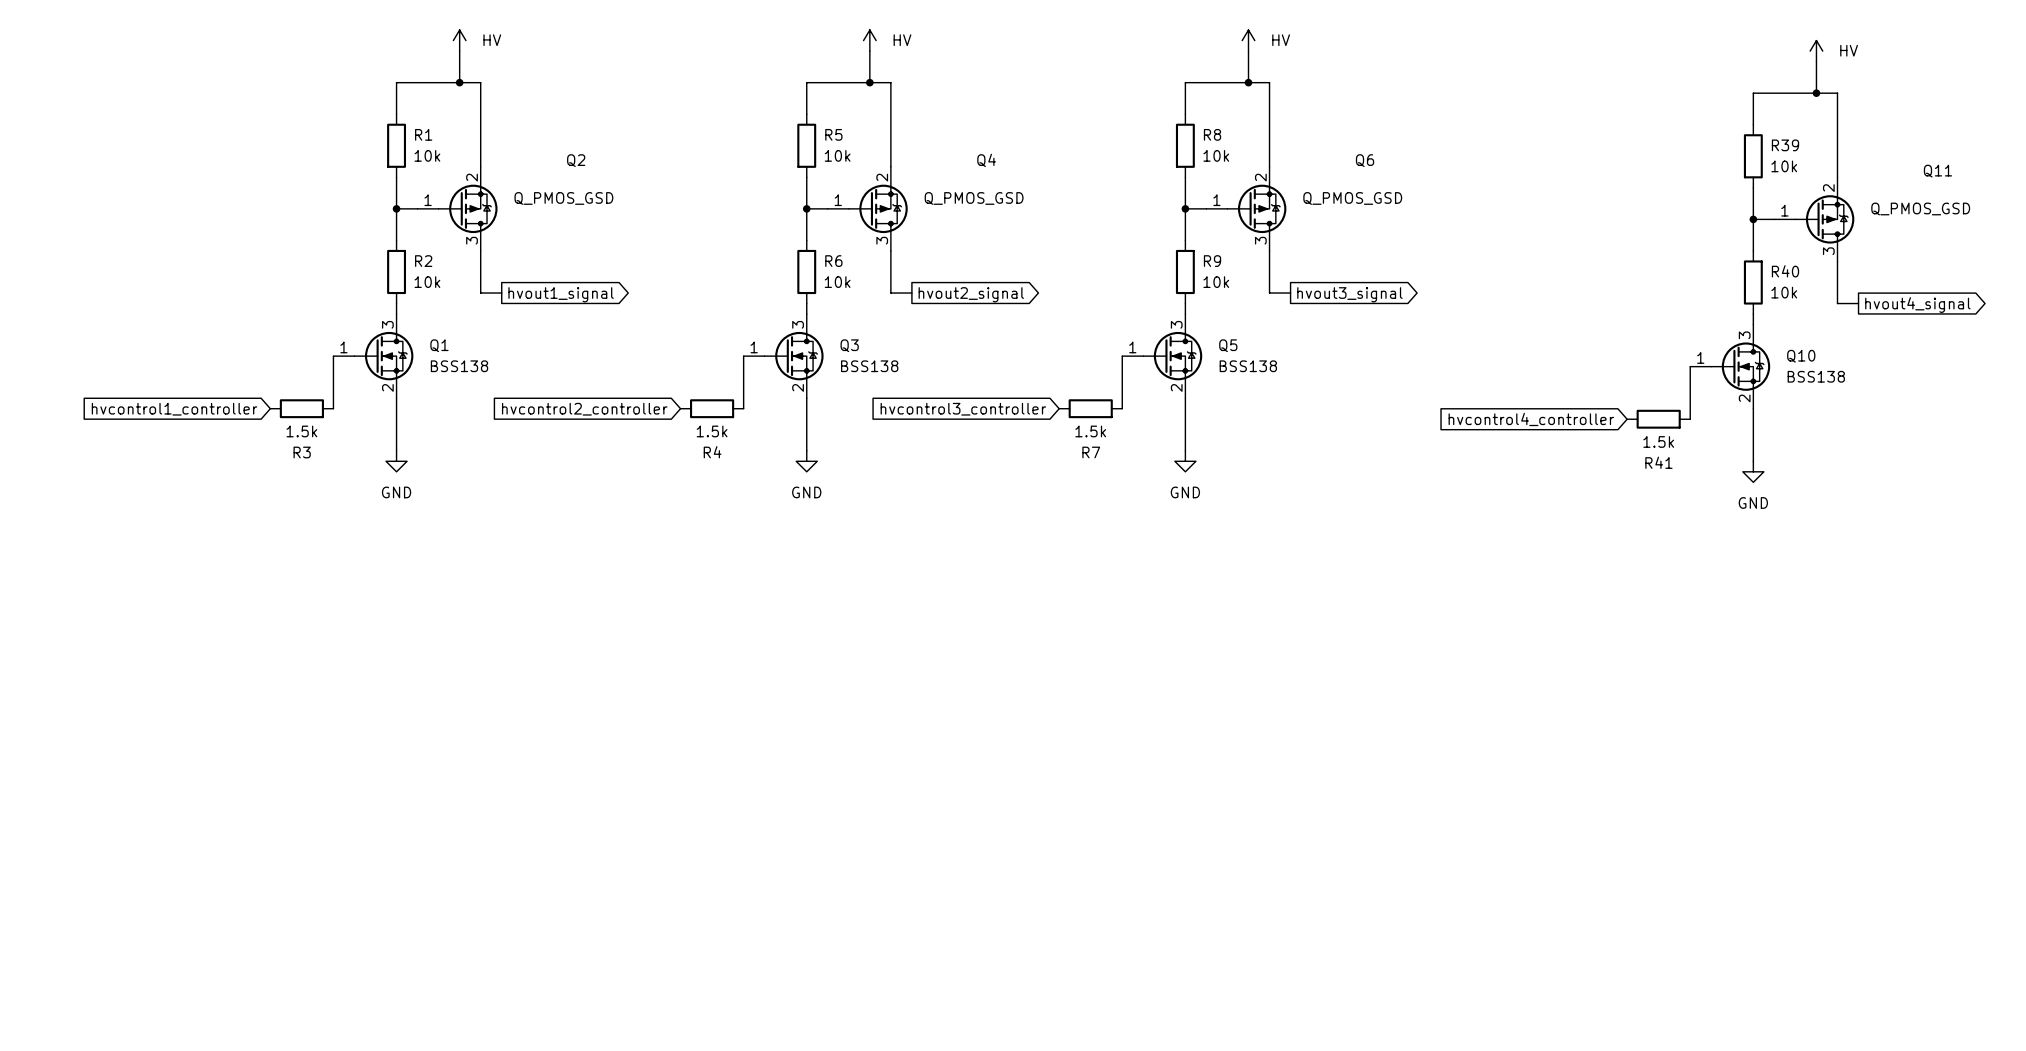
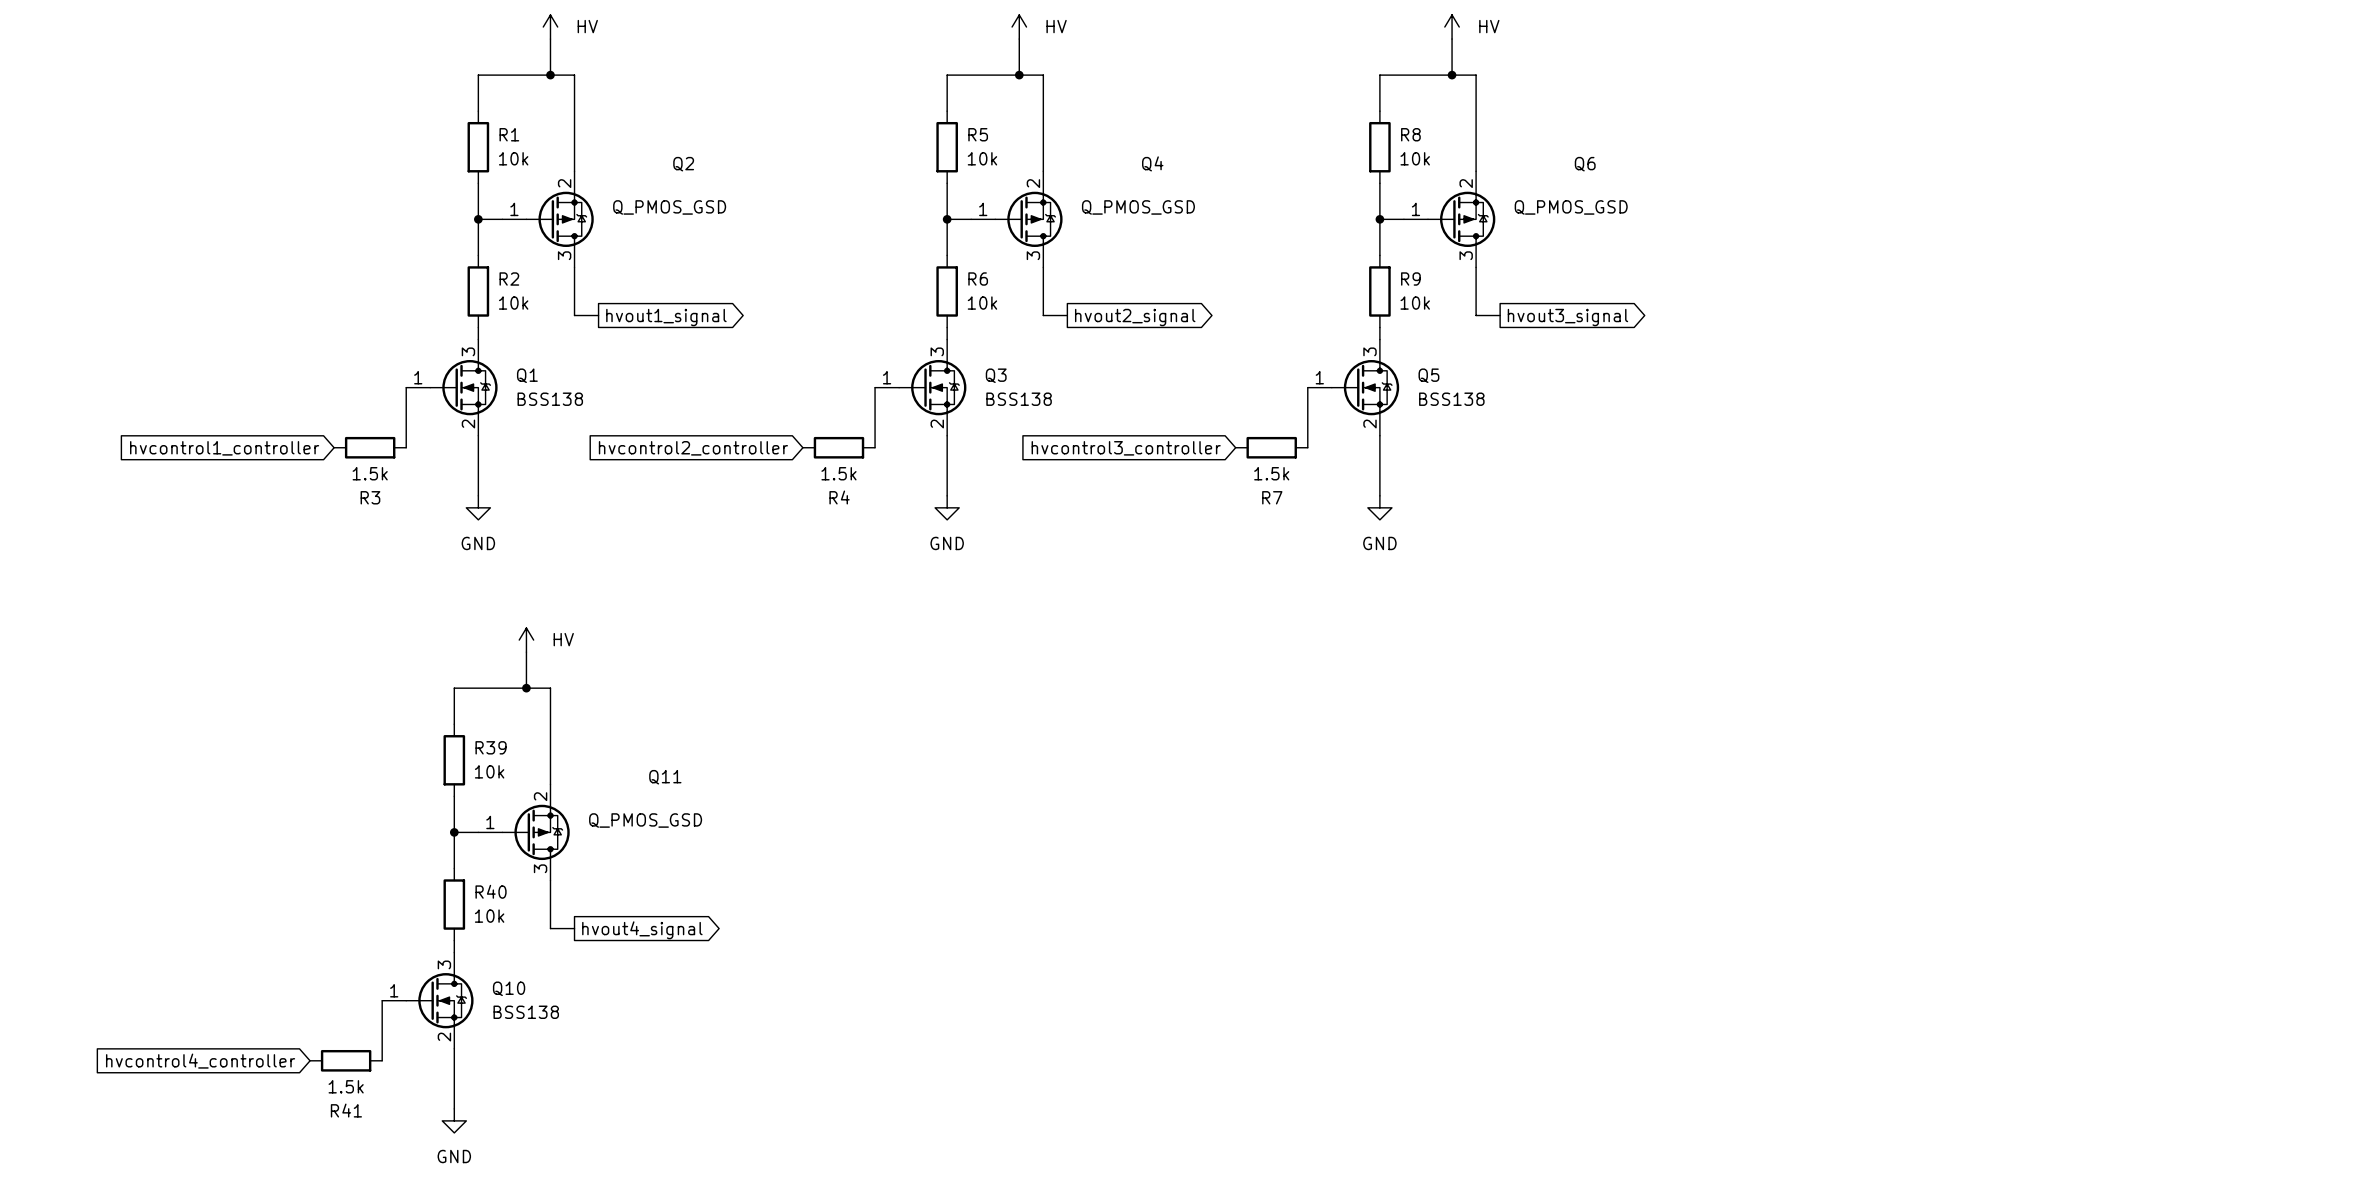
power symbol: HV (1816, 51) -> none
wire: (1816, 61) (1816, 93) -> none
junction: (1816, 93) -> none
wire: (1753, 124) (1753, 93) (1837, 93) (1837, 177) -> none
R39 position: (1753, 156) -> (454, 760)
wire: (1753, 187) (1753, 250) -> none
wire: (1753, 219) (1774, 219) -> none
junction: (1753, 219) -> none
Q11 position: (1814, 219) -> (524, 832)
wire: (1837, 261) (1837, 303) (1858, 303) -> none
R40 position: (1753, 282) -> (454, 904)
global label: hvout4_signal (1917, 305) -> none
wire: (1753, 314) (1753, 324) -> none
wire: (1690, 366) (1690, 419) -> none
Q10 position: (1730, 366) -> (427, 1000)
wire: (1753, 408) (1753, 461) -> none
global label: hvcontrol4_controller (1531, 419) -> none
R41 position: (1658, 419) -> (346, 1060)
power symbol: GND (1753, 471) -> none
power symbol: none -> HV (526, 640)
wire: none -> (526, 652) (526, 688)
junction: none -> (526, 688)
wire: none -> (454, 724) (454, 688) (550, 688) (550, 784)
wire: none -> (454, 796) (454, 868)
wire: none -> (454, 832) (478, 832)
junction: none -> (454, 832)
wire: none -> (550, 880) (550, 928) (574, 928)
global label: none -> hvout4_signal (642, 930)
wire: none -> (454, 940) (454, 952)
wire: none -> (382, 1000) (382, 1060)
wire: none -> (454, 1048) (454, 1108)
global label: none -> hvcontrol4_controller (200, 1061)
power symbol: none -> GND (454, 1120)

